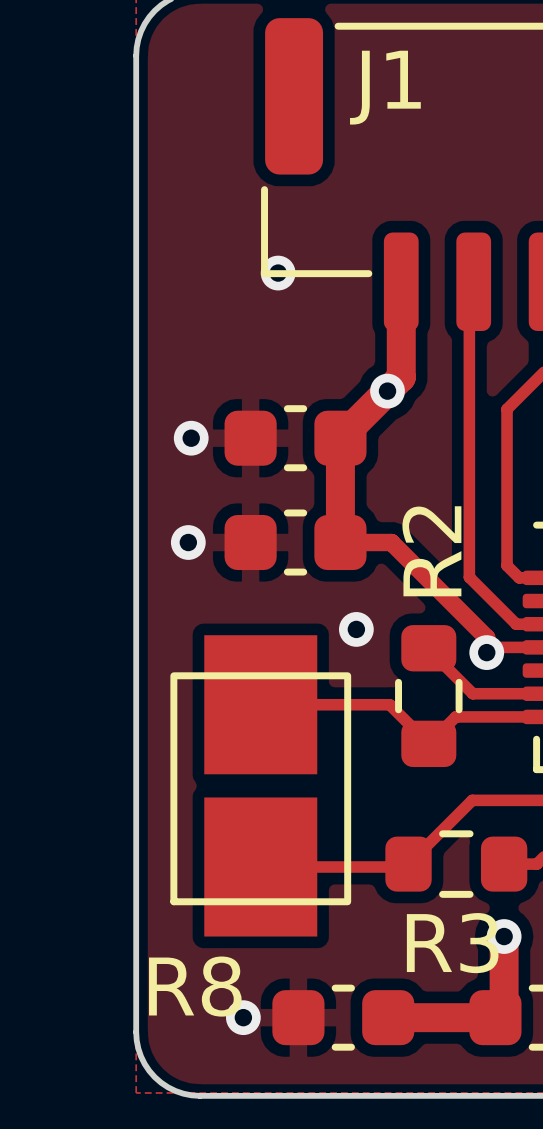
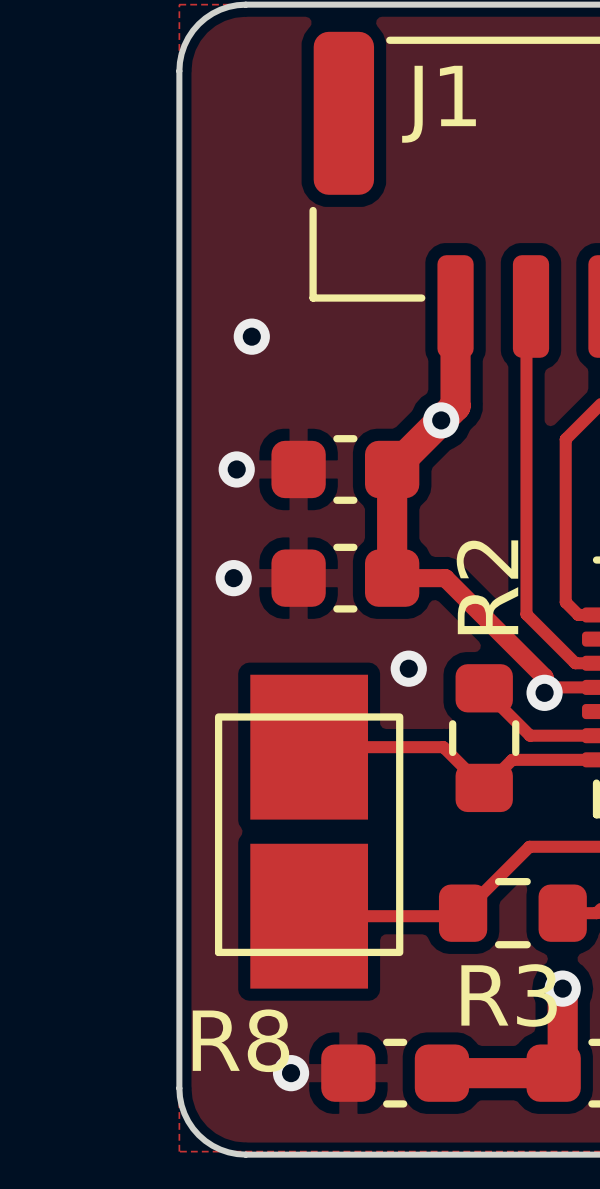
via position: (278, 273) -> (251, 336)

